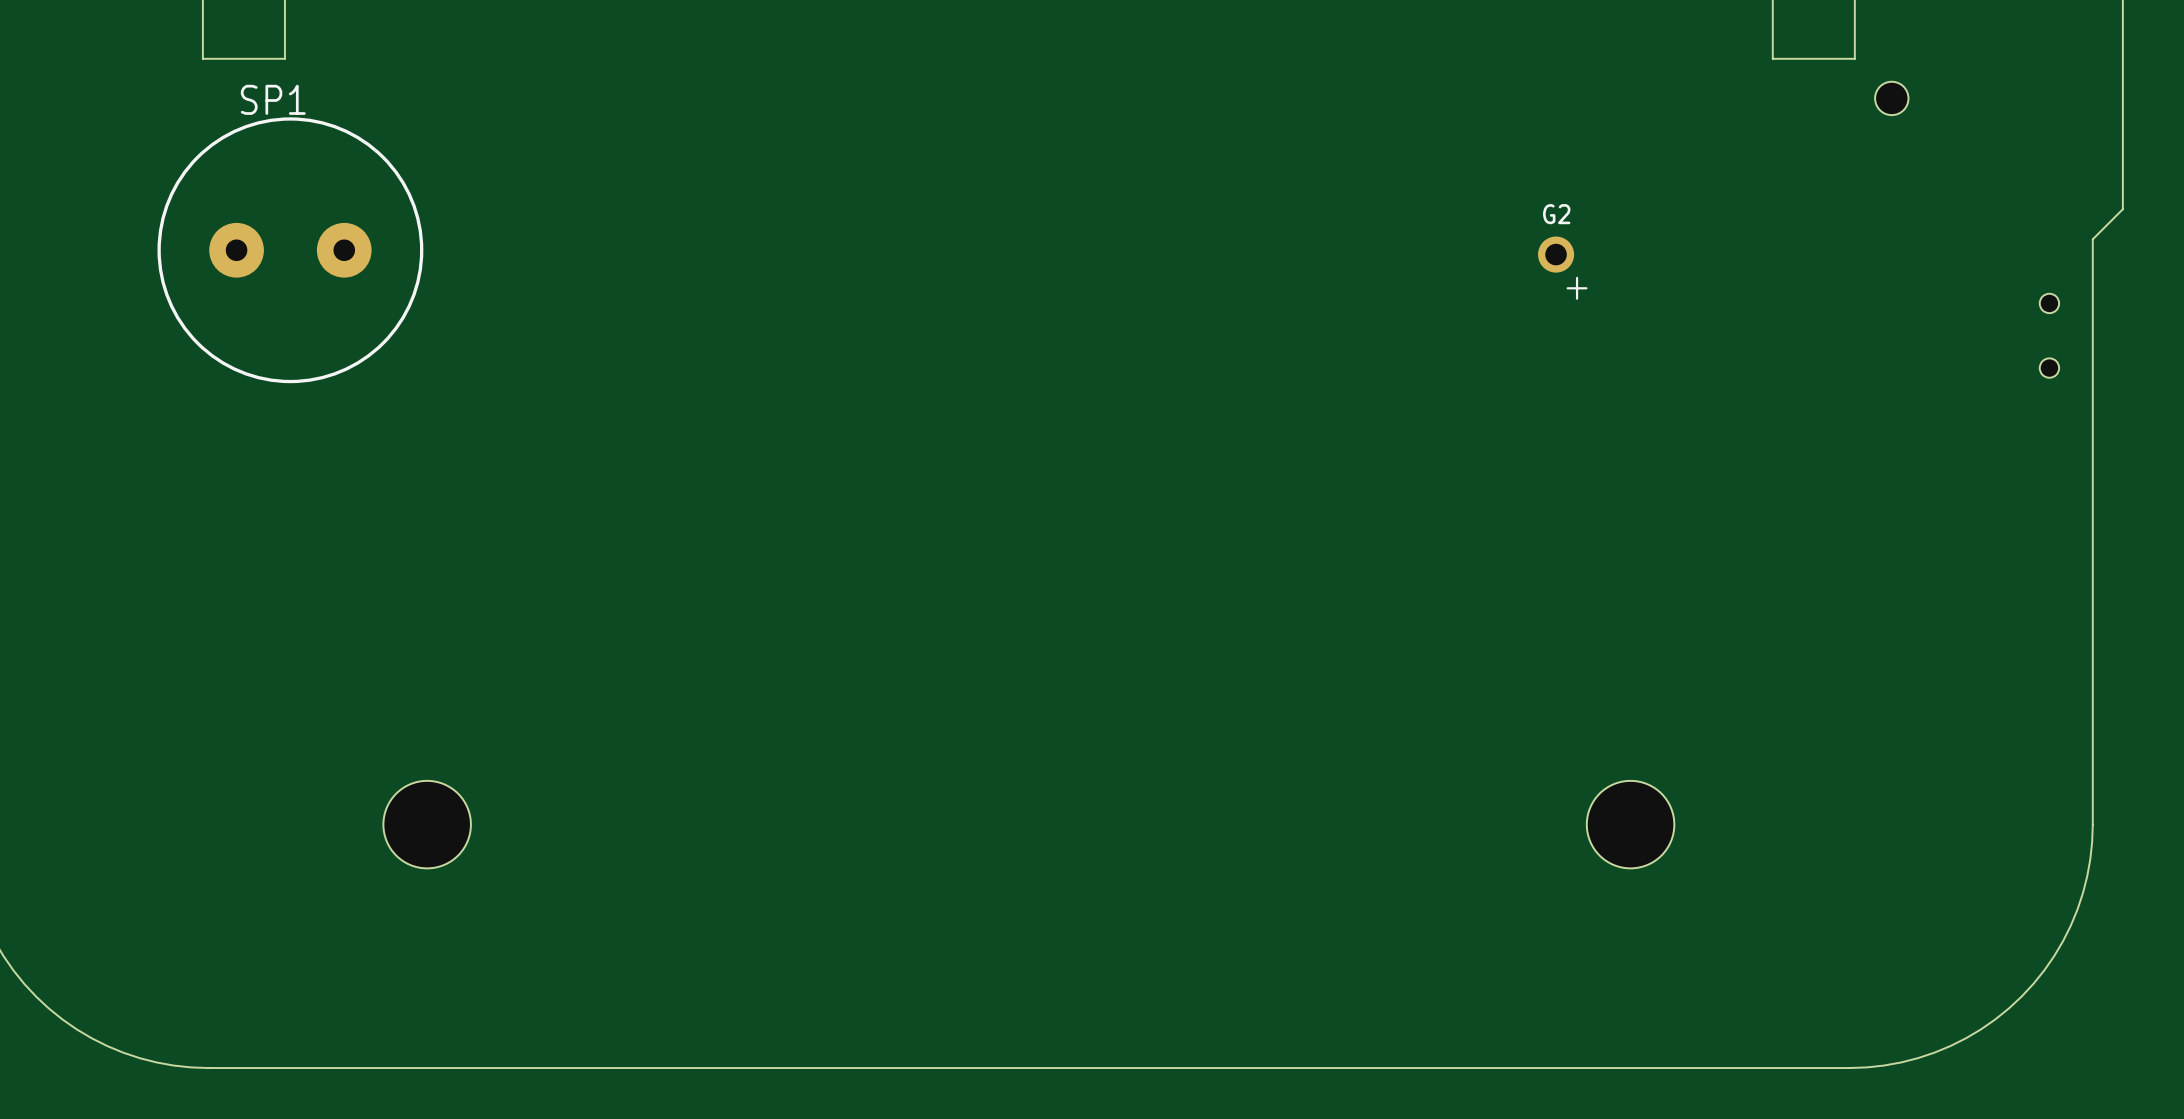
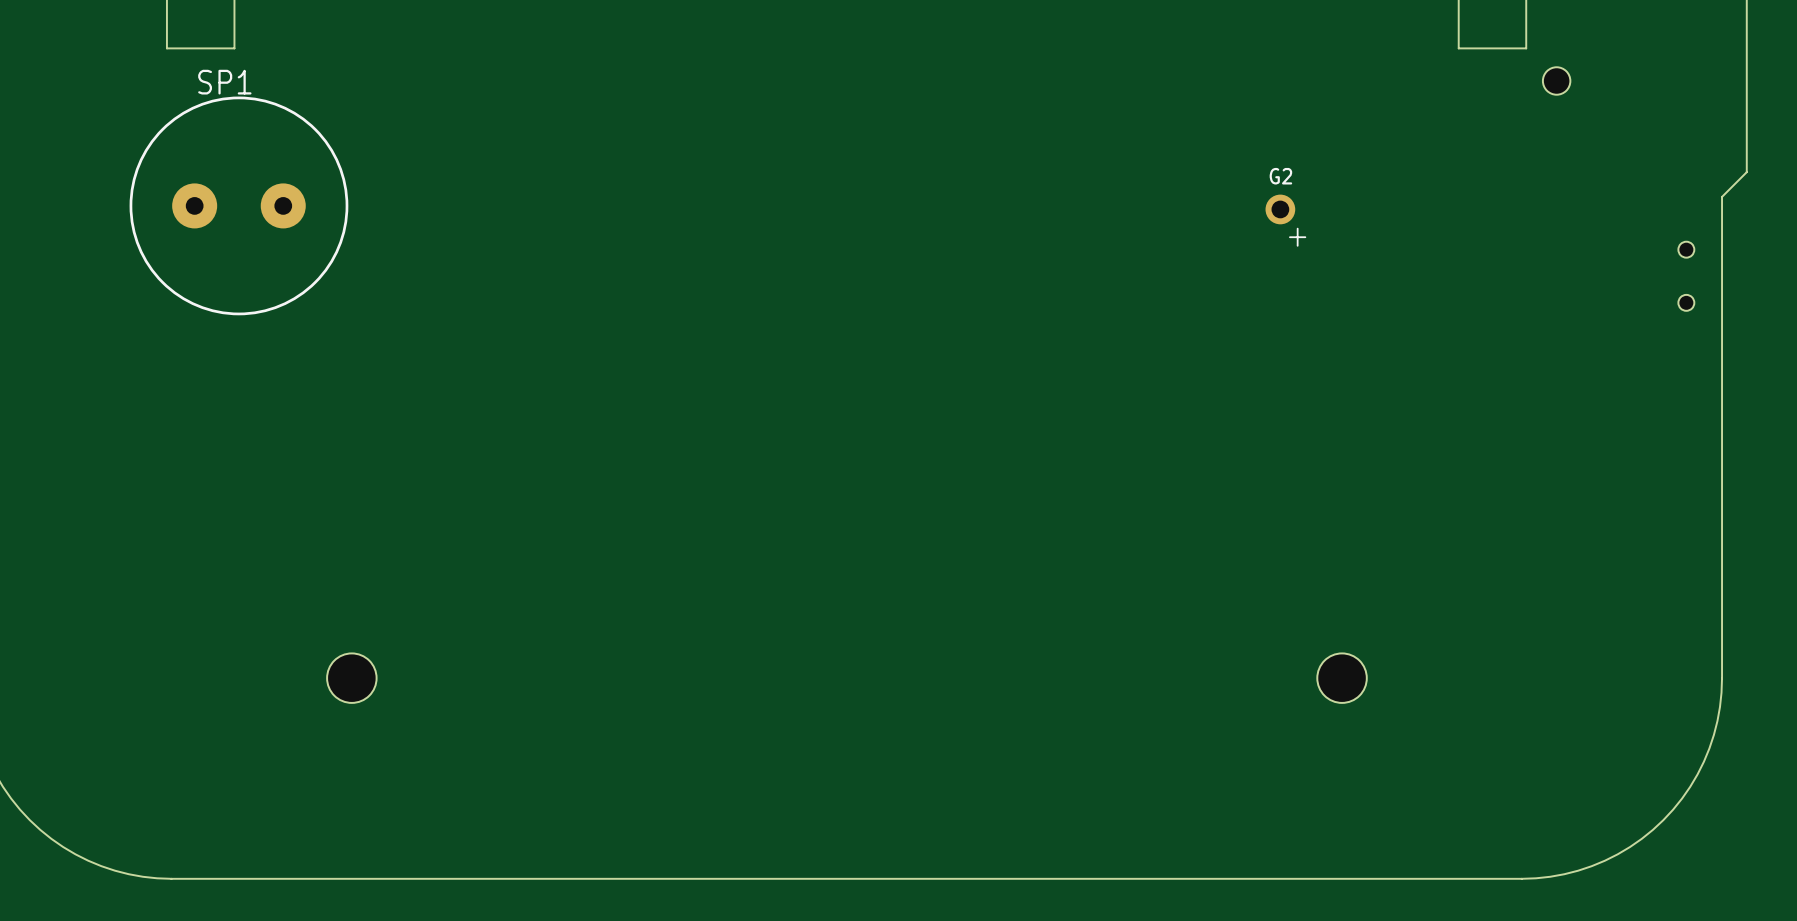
hole size: [383, 780, 471, 869] -> [327, 653, 377, 703]
hole size: [1586, 780, 1675, 869] -> [1317, 653, 1367, 703]

